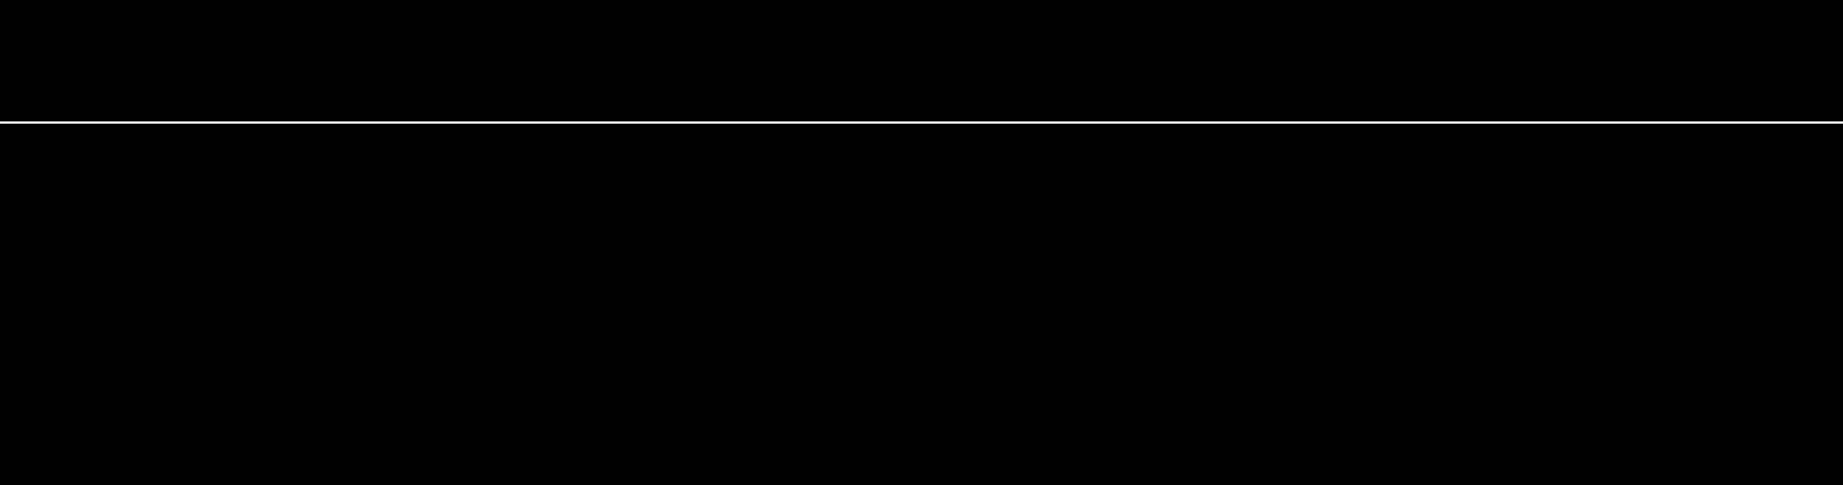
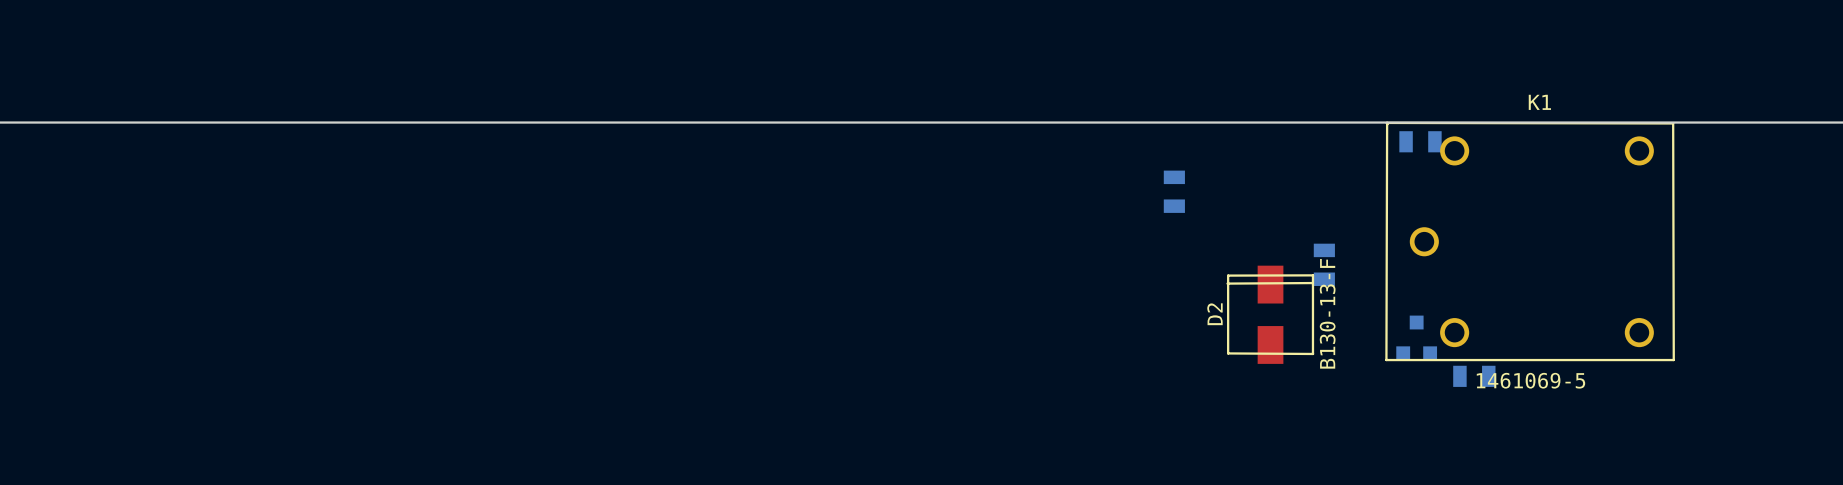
part: none -> (1420, 141)
part: none -> (1174, 191)
K1: none -> 1461069-5 (1530, 241)
part: none -> (1324, 264)
D2: none -> B130-13-F (1270, 314)
part: none -> (1416, 337)
part: none -> (1474, 376)

